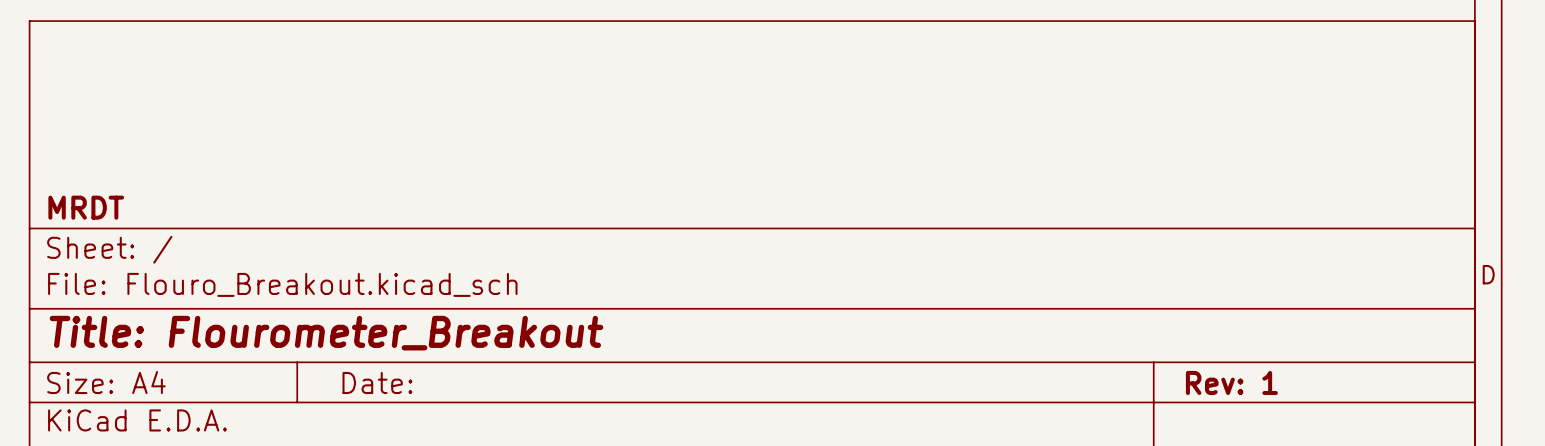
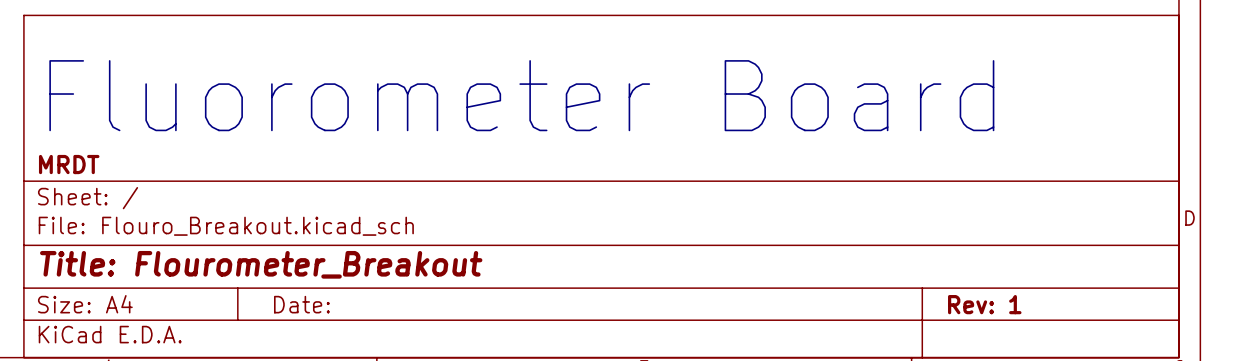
text: none -> Fluorometer Board (521, 95)

